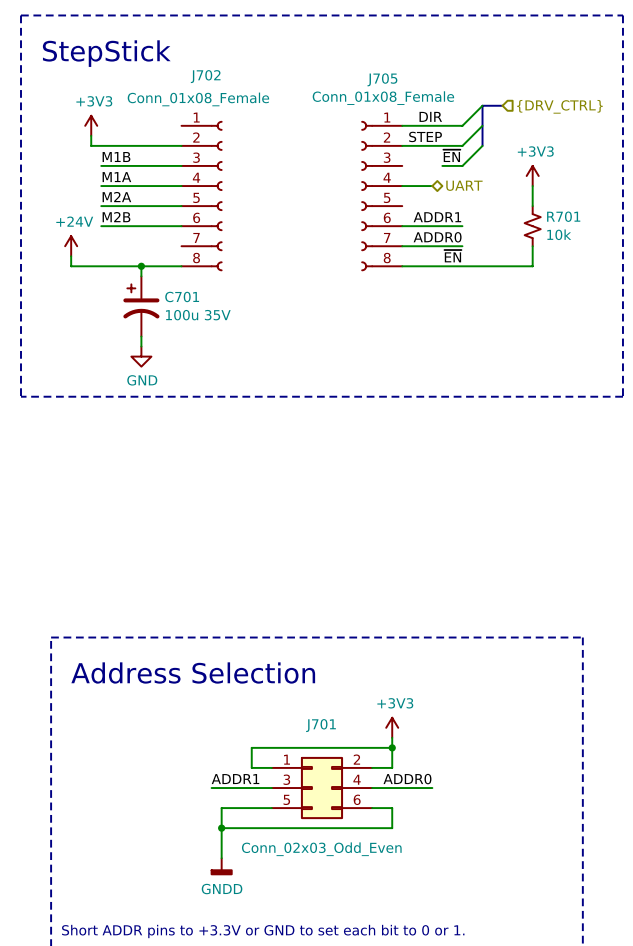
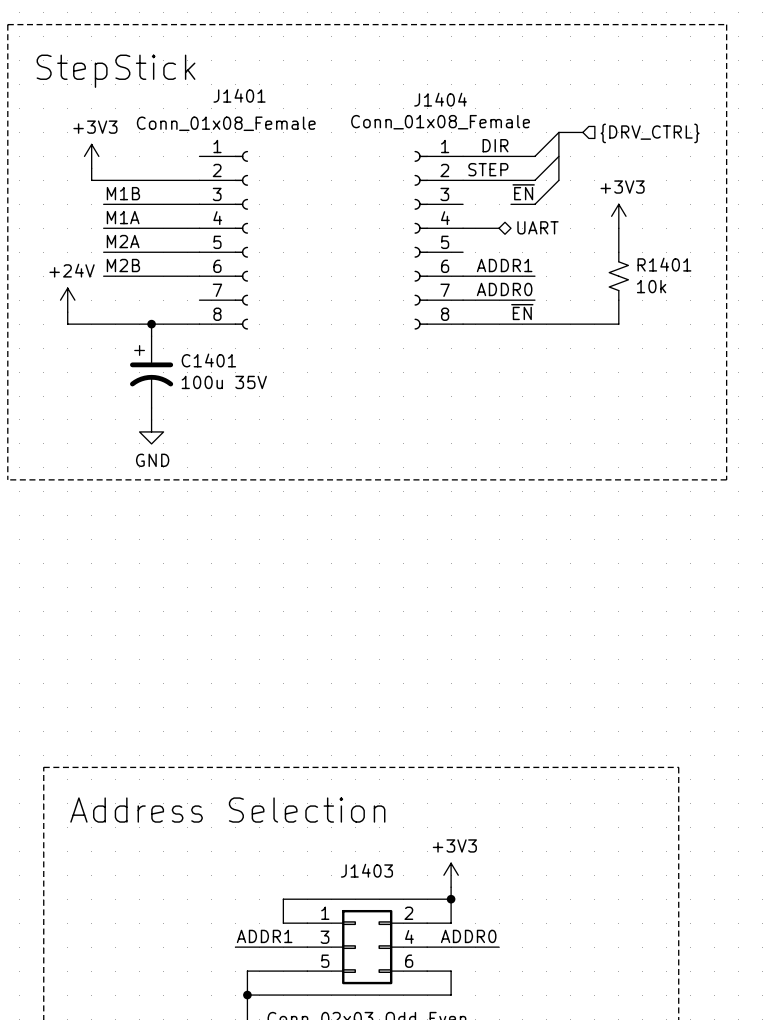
J702 name: J702 (205, 76) -> J1401 (239, 95)
J705 name: J705 (382, 79) -> J1404 (440, 99)
R701 name: R701 (563, 216) -> R1401 (664, 264)
C701 name: C701 (182, 296) -> C1401 (208, 360)
J701 name: J701 (321, 725) -> J1403 (366, 870)

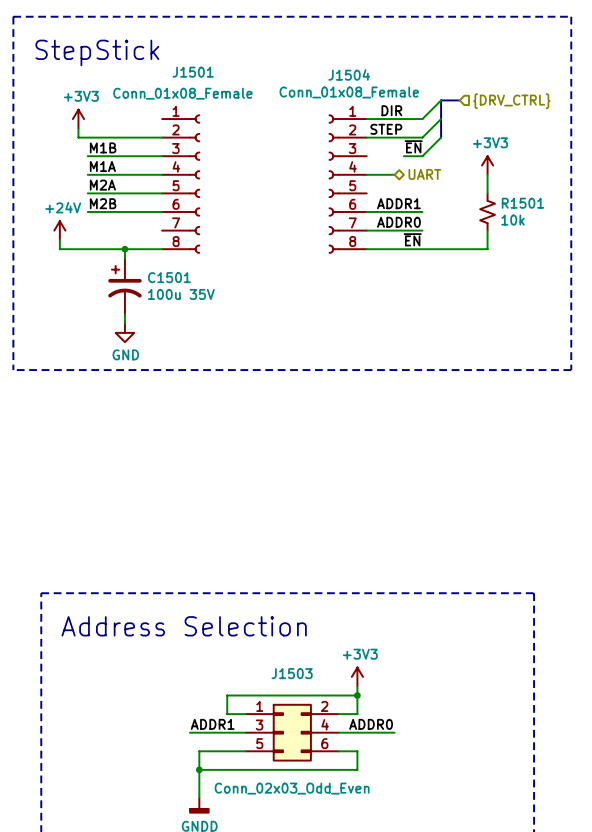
J1401 name: J1401 (239, 95) -> J1501 (193, 72)
J1404 name: J1404 (440, 99) -> J1504 (349, 74)
R1401 name: R1401 (664, 264) -> R1501 (522, 203)
C1401 name: C1401 (208, 360) -> C1501 (169, 277)
J1403 name: J1403 (366, 870) -> J1503 (292, 673)

